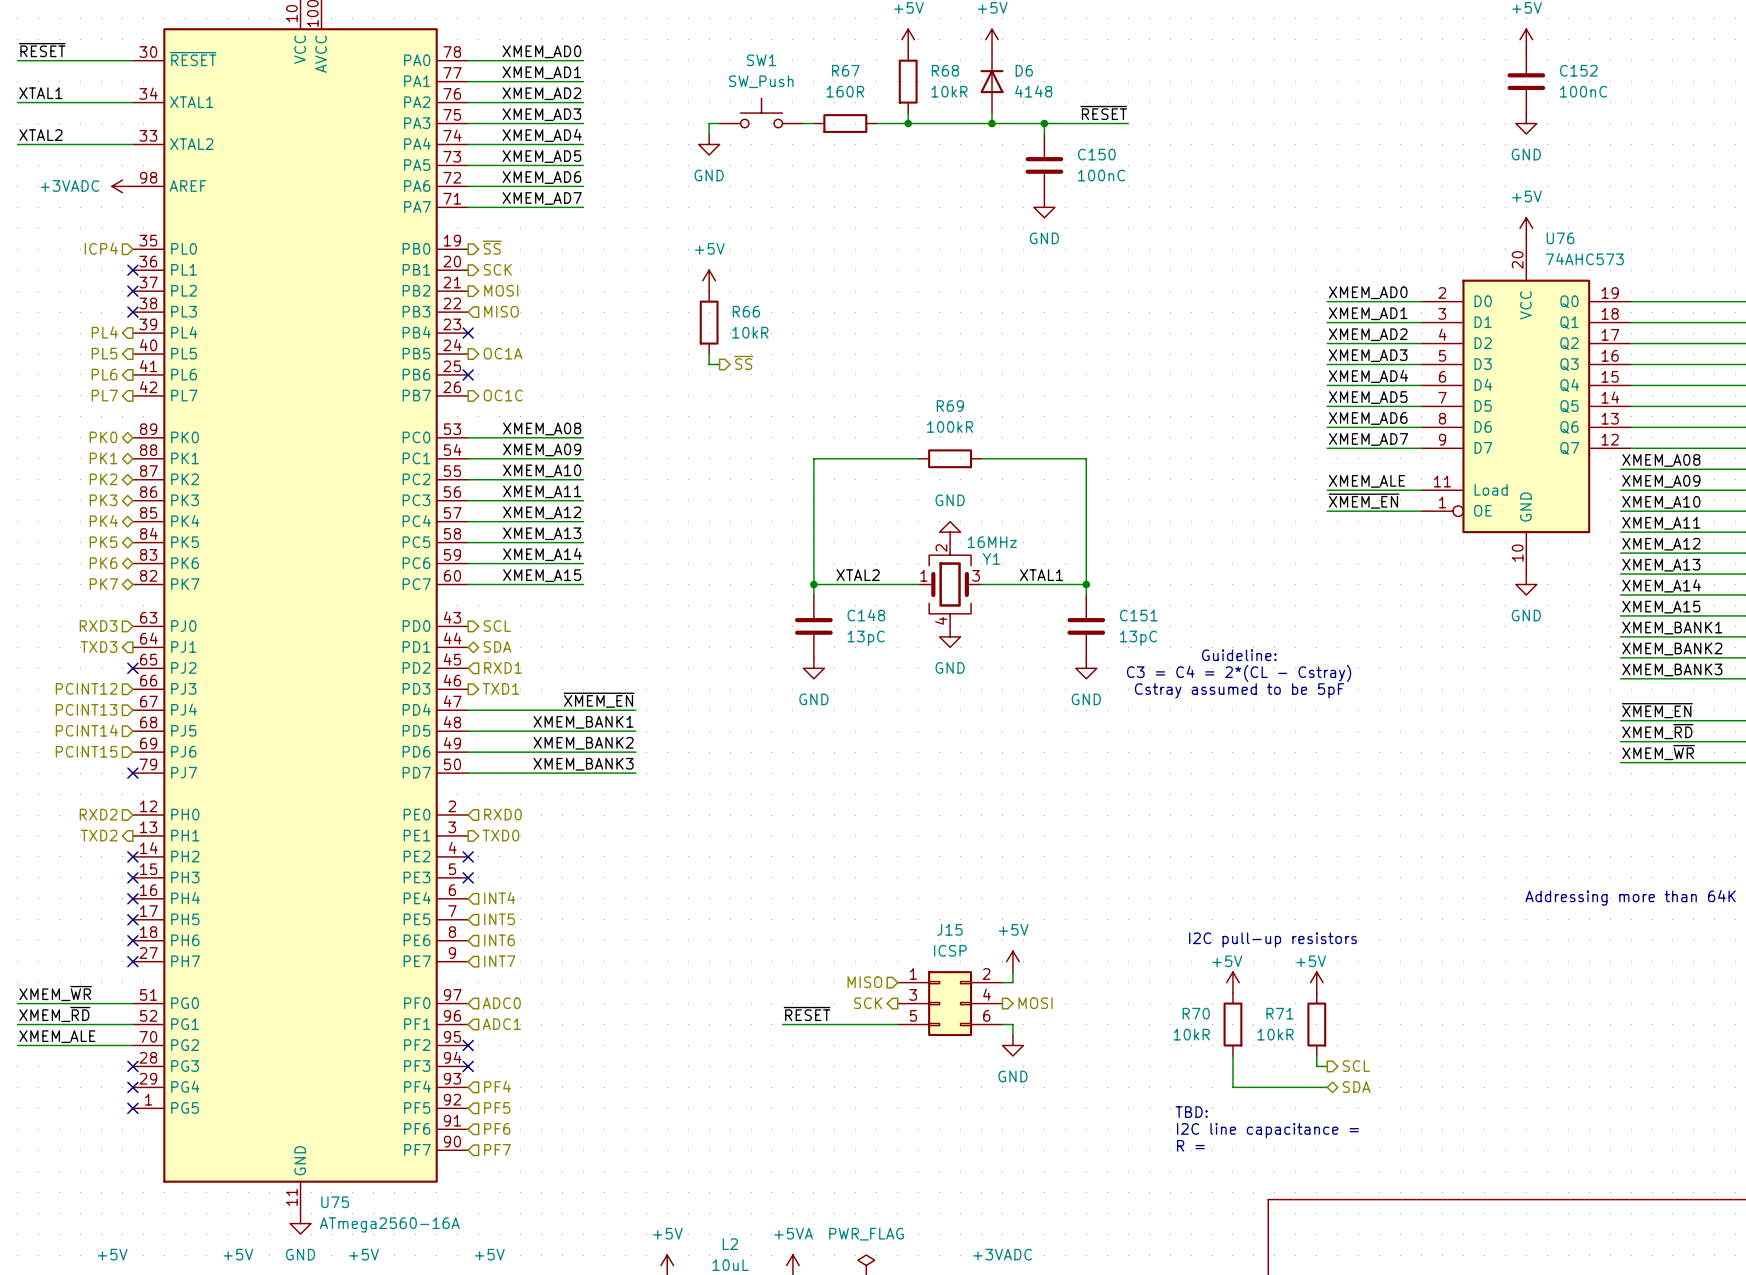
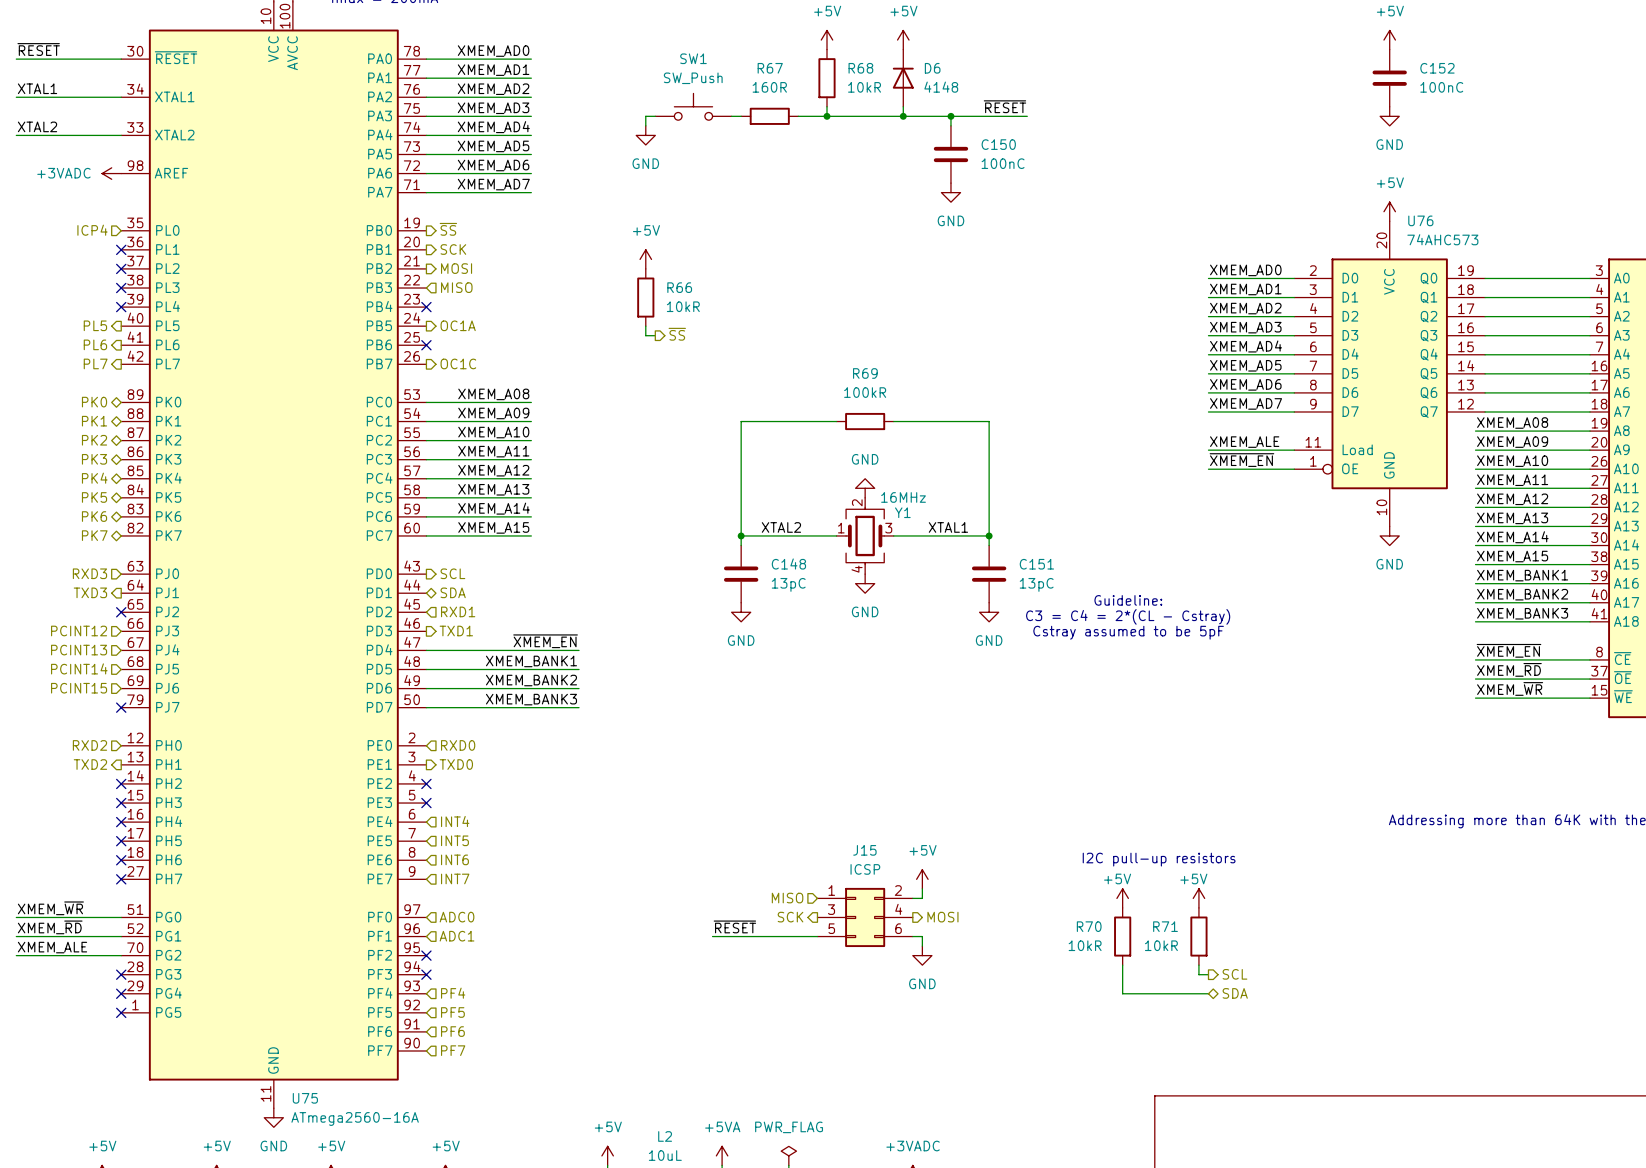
hierarchical label: PL4 (104, 332) -> none
no-connect mark: none -> (121, 307)
text: TBD: (1191, 1112) -> none
text: I2C line capacitance = (1267, 1130) -> none
text: R = (1190, 1145) -> none

